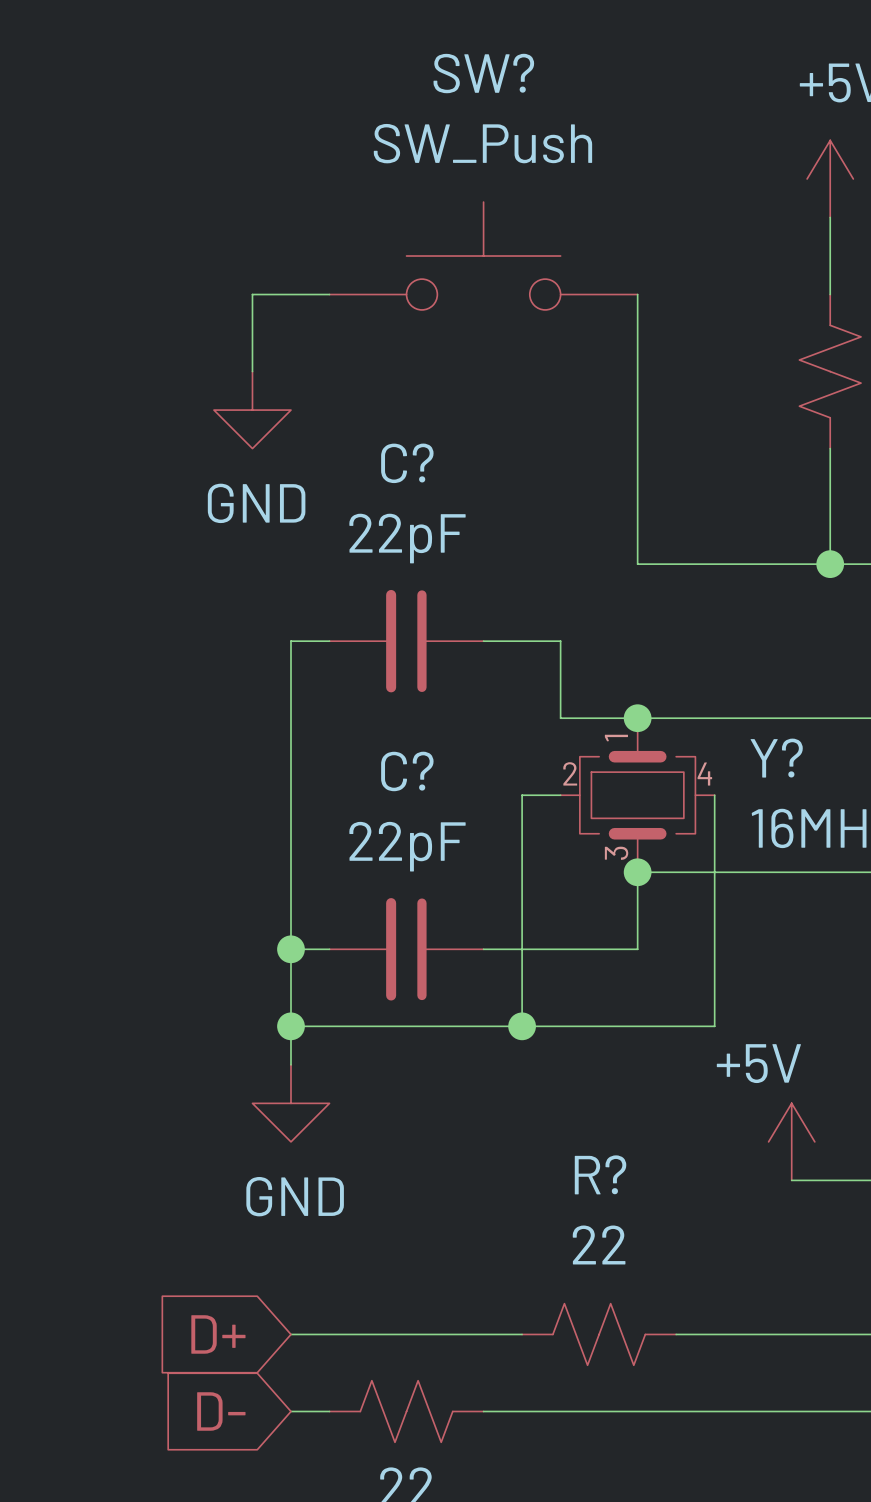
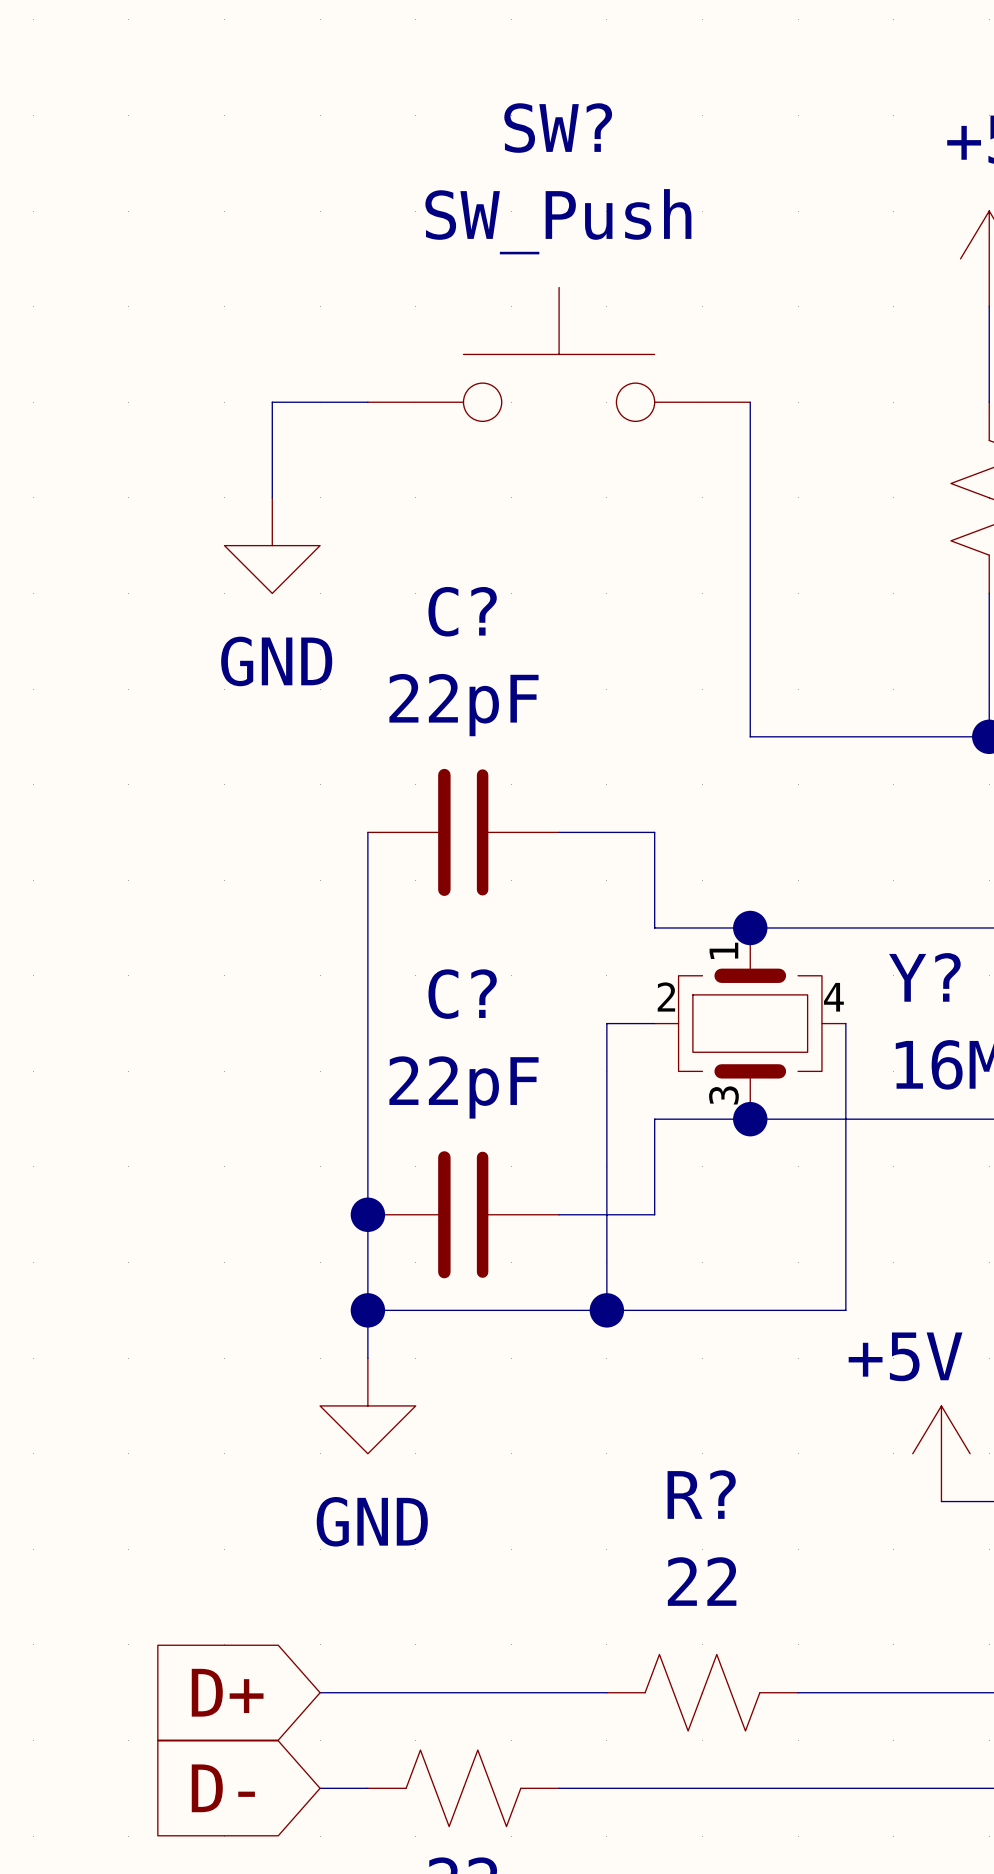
wire: (329, 641) (290, 641) (290, 1064) -> (367, 832) (367, 1358)
wire: (637, 872) (637, 949) (560, 949) -> (750, 1119) (654, 1119) (654, 1214)
wire: (290, 949) (329, 949) -> none
junction position: (290, 949) -> (367, 1214)
wire: (290, 1026) (329, 1026) -> none
junction position: (290, 1026) -> (367, 1310)
power symbol position: GND (290, 1103) -> GND (367, 1405)

